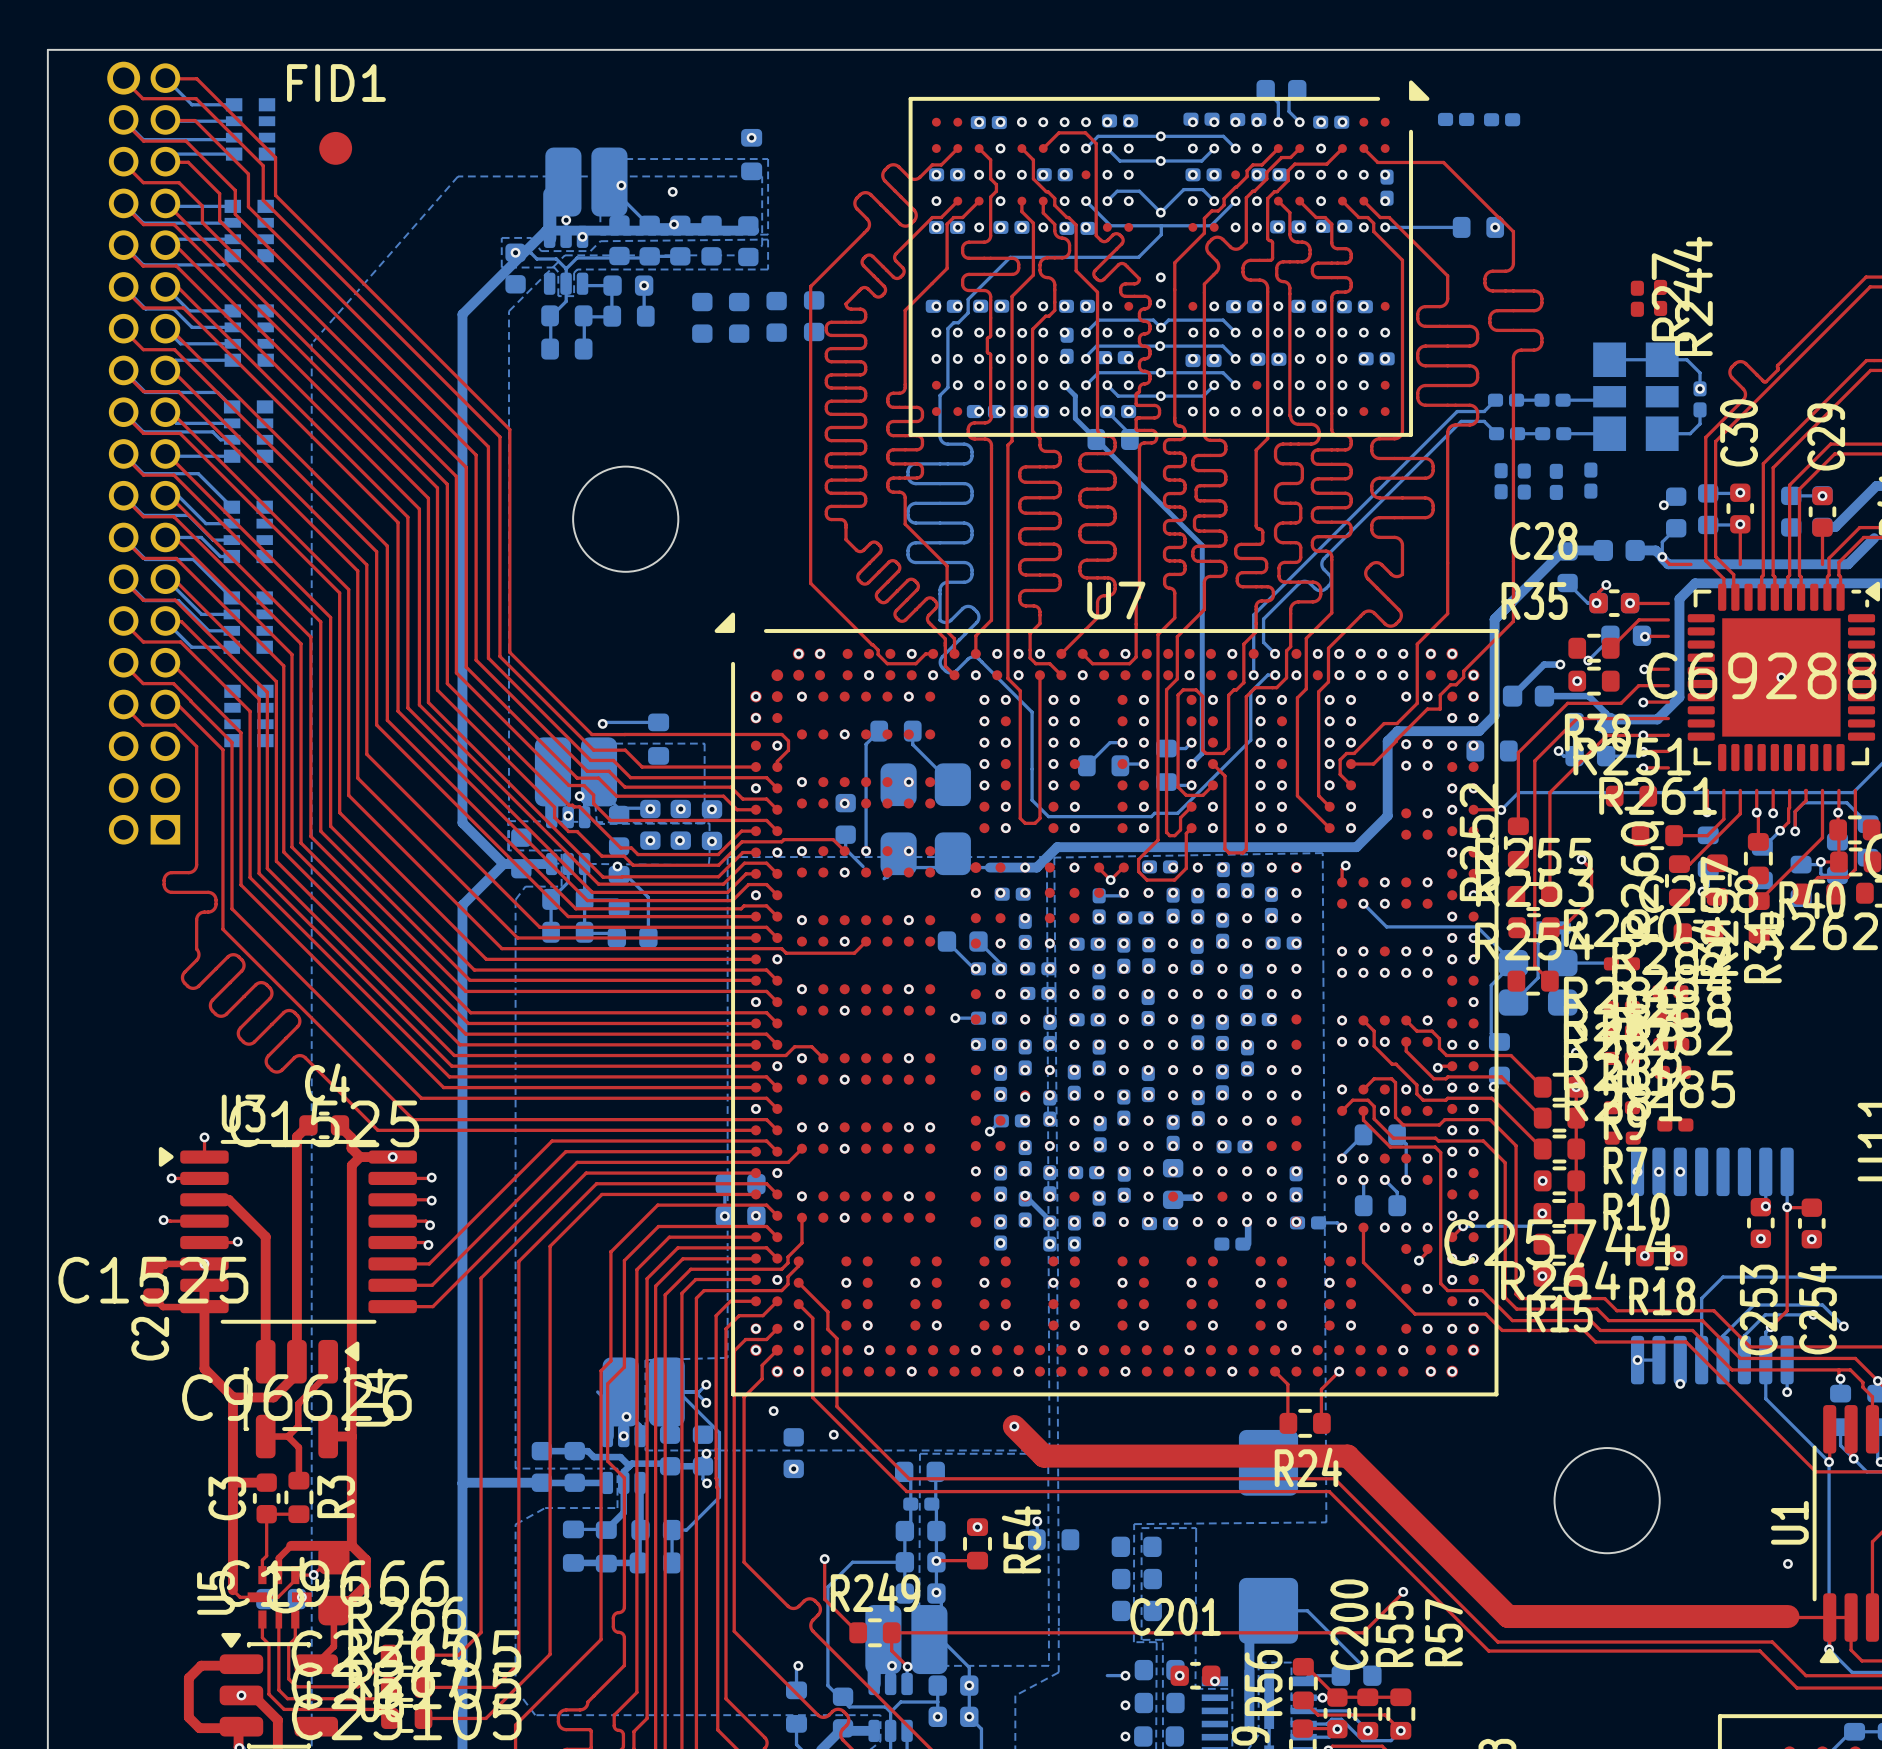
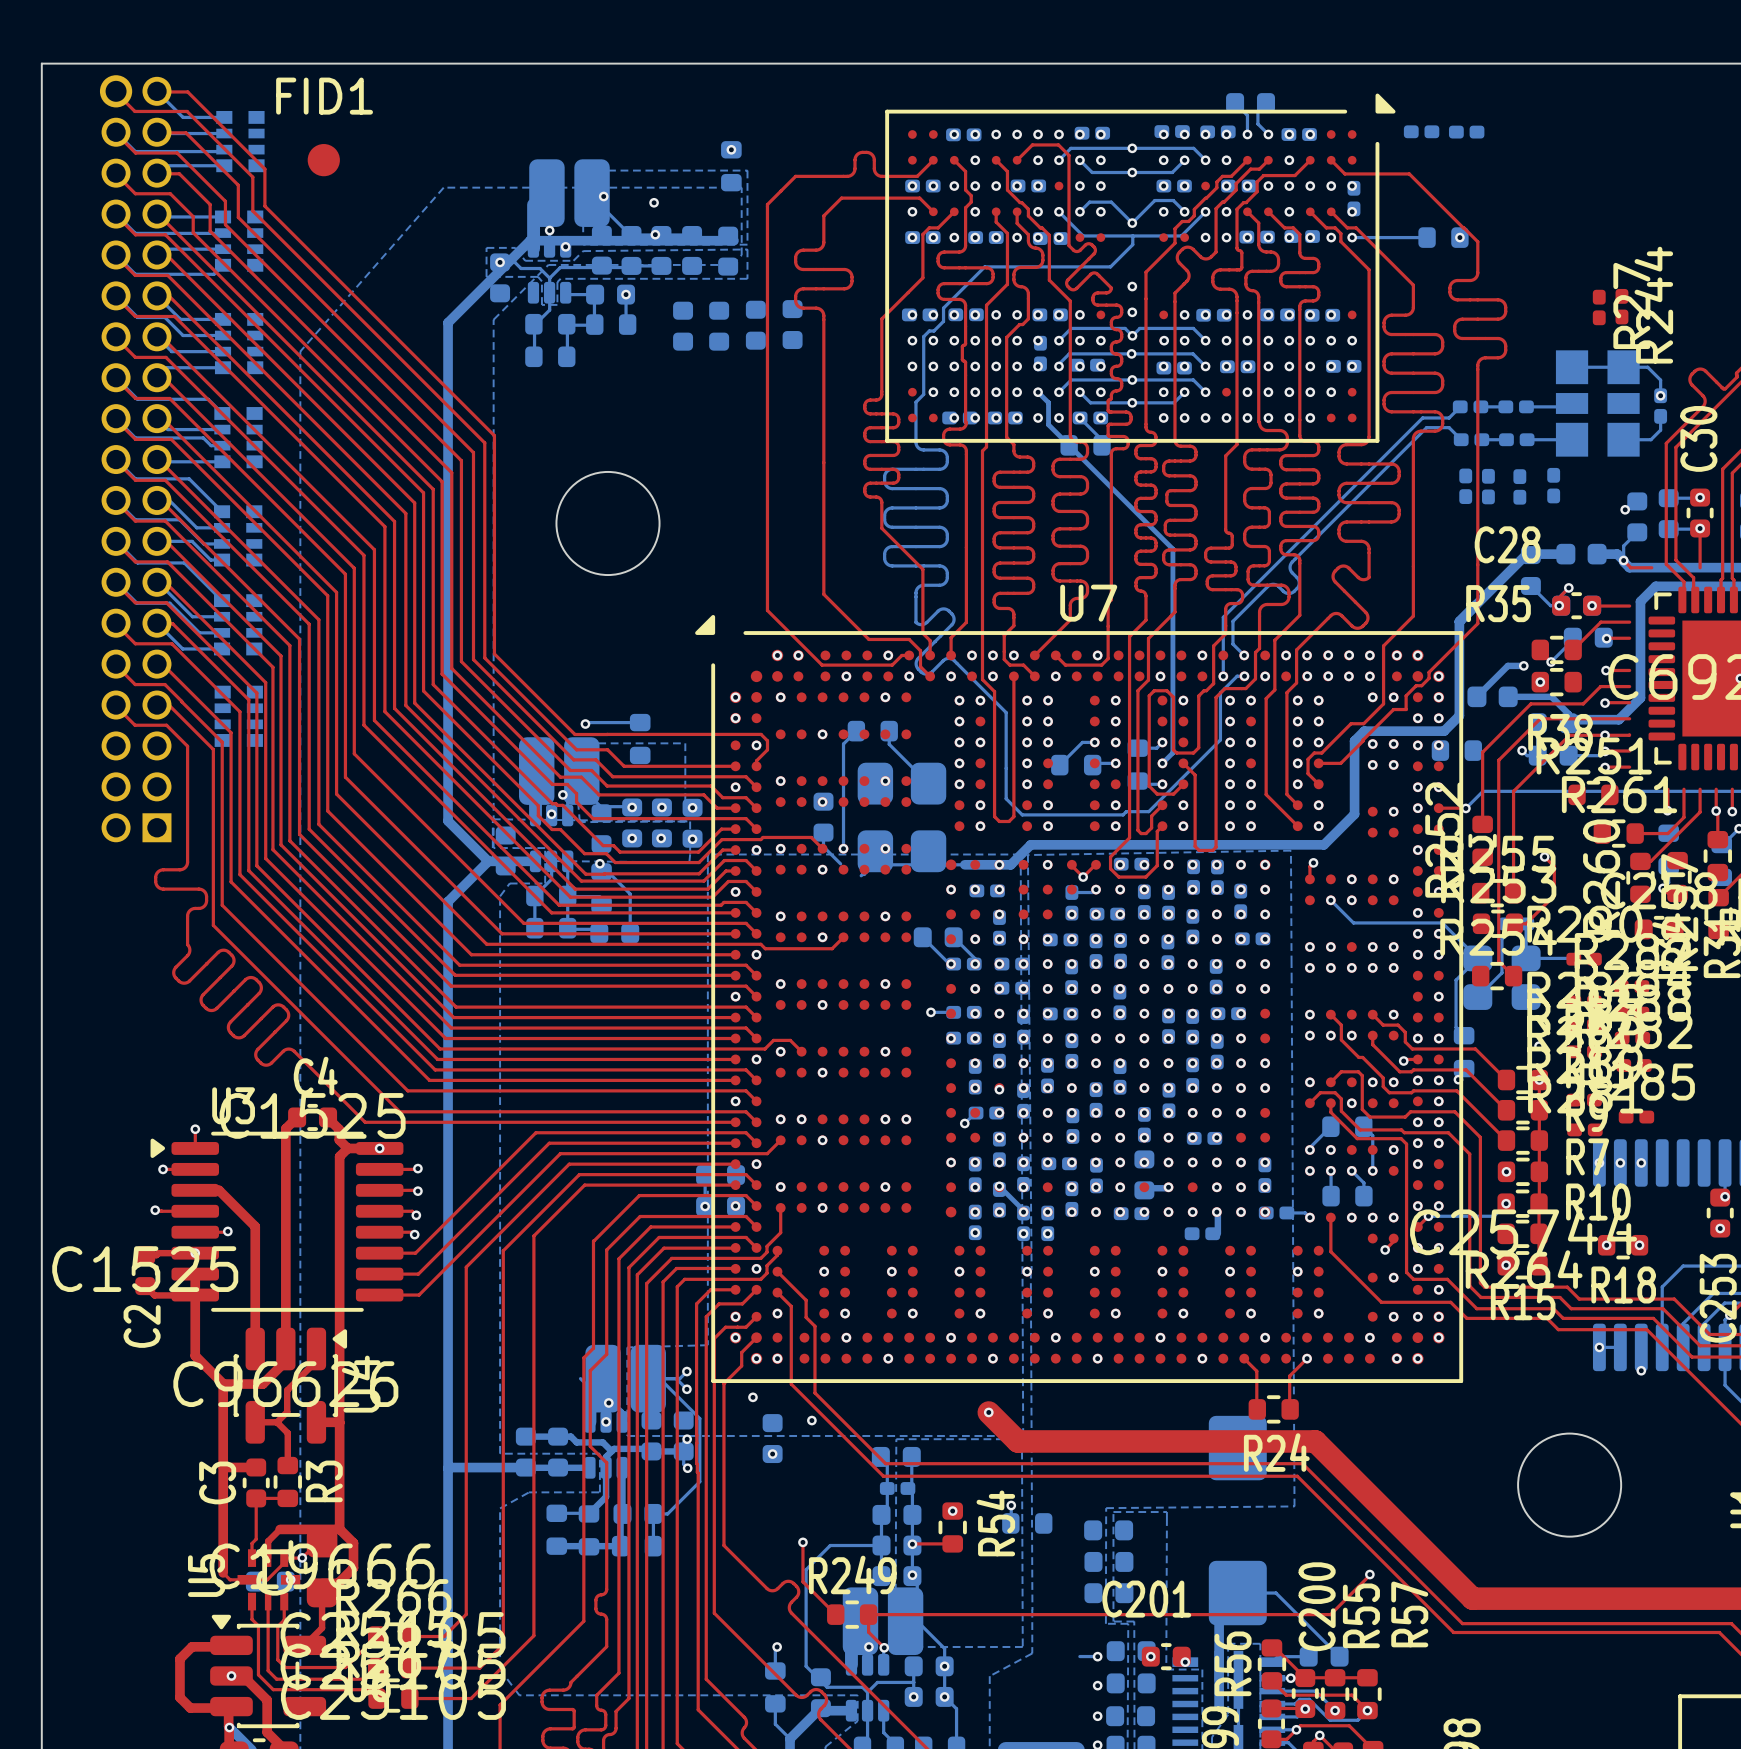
top track: (932, 164) (915, 179) (909, 177) (896, 165) (890, 165) (885, 169) (882, 174) (883, 179) (914, 210) (915, 219) (908, 225) (902, 225) (870, 194) (861, 193) (855, 199) (855, 205) (868, 220) (868, 228) (810, 286) (810, 583) (878, 650) (878, 654) (887, 663) -> (908, 176) (878, 175) (874, 171) (872, 155) (868, 152) (861, 152) (855, 156) (854, 170) (851, 175) (795, 176) (767, 204) (767, 610) (822, 665) (864, 665)
top track: (957, 201) (941, 217) (932, 217) (895, 254) (895, 259) (904, 270) (899, 277) (893, 277) (872, 255) (865, 256) (862, 260) (862, 264) (884, 286) (884, 292) (877, 296) (867, 288) (861, 288) (846, 304) (849, 308) (864, 310) (865, 314) (864, 320) (830, 322) (826, 325) (826, 331) (829, 335) (861, 335) (865, 340) (865, 345) (861, 348) (830, 348) (826, 353) (826, 358) (830, 361) (861, 361) (865, 366) (865, 371) (861, 374) (830, 374) (826, 379) (826, 384) (830, 387) (861, 388) (865, 392) (865, 397) (861, 401) (830, 401) (826, 405) (826, 411) (830, 414) (861, 414) (865, 418) (865, 424) (861, 427) (830, 427) (826, 432) (826, 437) (830, 440) (861, 440) (865, 444) (865, 450) (861, 453) (830, 453) (826, 457) (826, 463) (830, 466) (861, 467) (865, 470) (865, 476) (861, 479) (830, 480) (826, 483) (826, 489) (829, 492) (861, 493) (865, 496) (865, 503) (861, 506) (831, 506) (827, 508) (827, 518) (842, 519) (846, 524) -> (933, 211) (919, 198) (841, 198) (823, 215) (822, 247) (816, 250) (800, 250) (796, 255) (796, 264) (800, 269) (845, 269) (849, 271) (851, 276) (851, 284) (846, 288) (802, 288) (797, 291) (795, 295) (796, 302) (799, 306) (818, 308) (823, 315) (823, 528)
top track: (846, 539) (859, 551) (862, 550) (872, 542) (876, 542) (880, 547) (880, 552) (858, 574) (858, 579) (862, 583) (868, 582) (890, 561) (894, 561) (899, 564) (898, 571) (877, 592) (876, 597) (880, 601) (886, 601) (908, 579) (913, 579) (917, 583) (917, 589) (895, 611) (895, 616) (899, 620) (905, 620) (927, 598) (931, 598) (935, 601) (936, 607) (927, 619) (945, 638) (945, 666) -> (823, 543) (823, 594) (868, 639) (909, 639) (920, 650) (921, 667)

